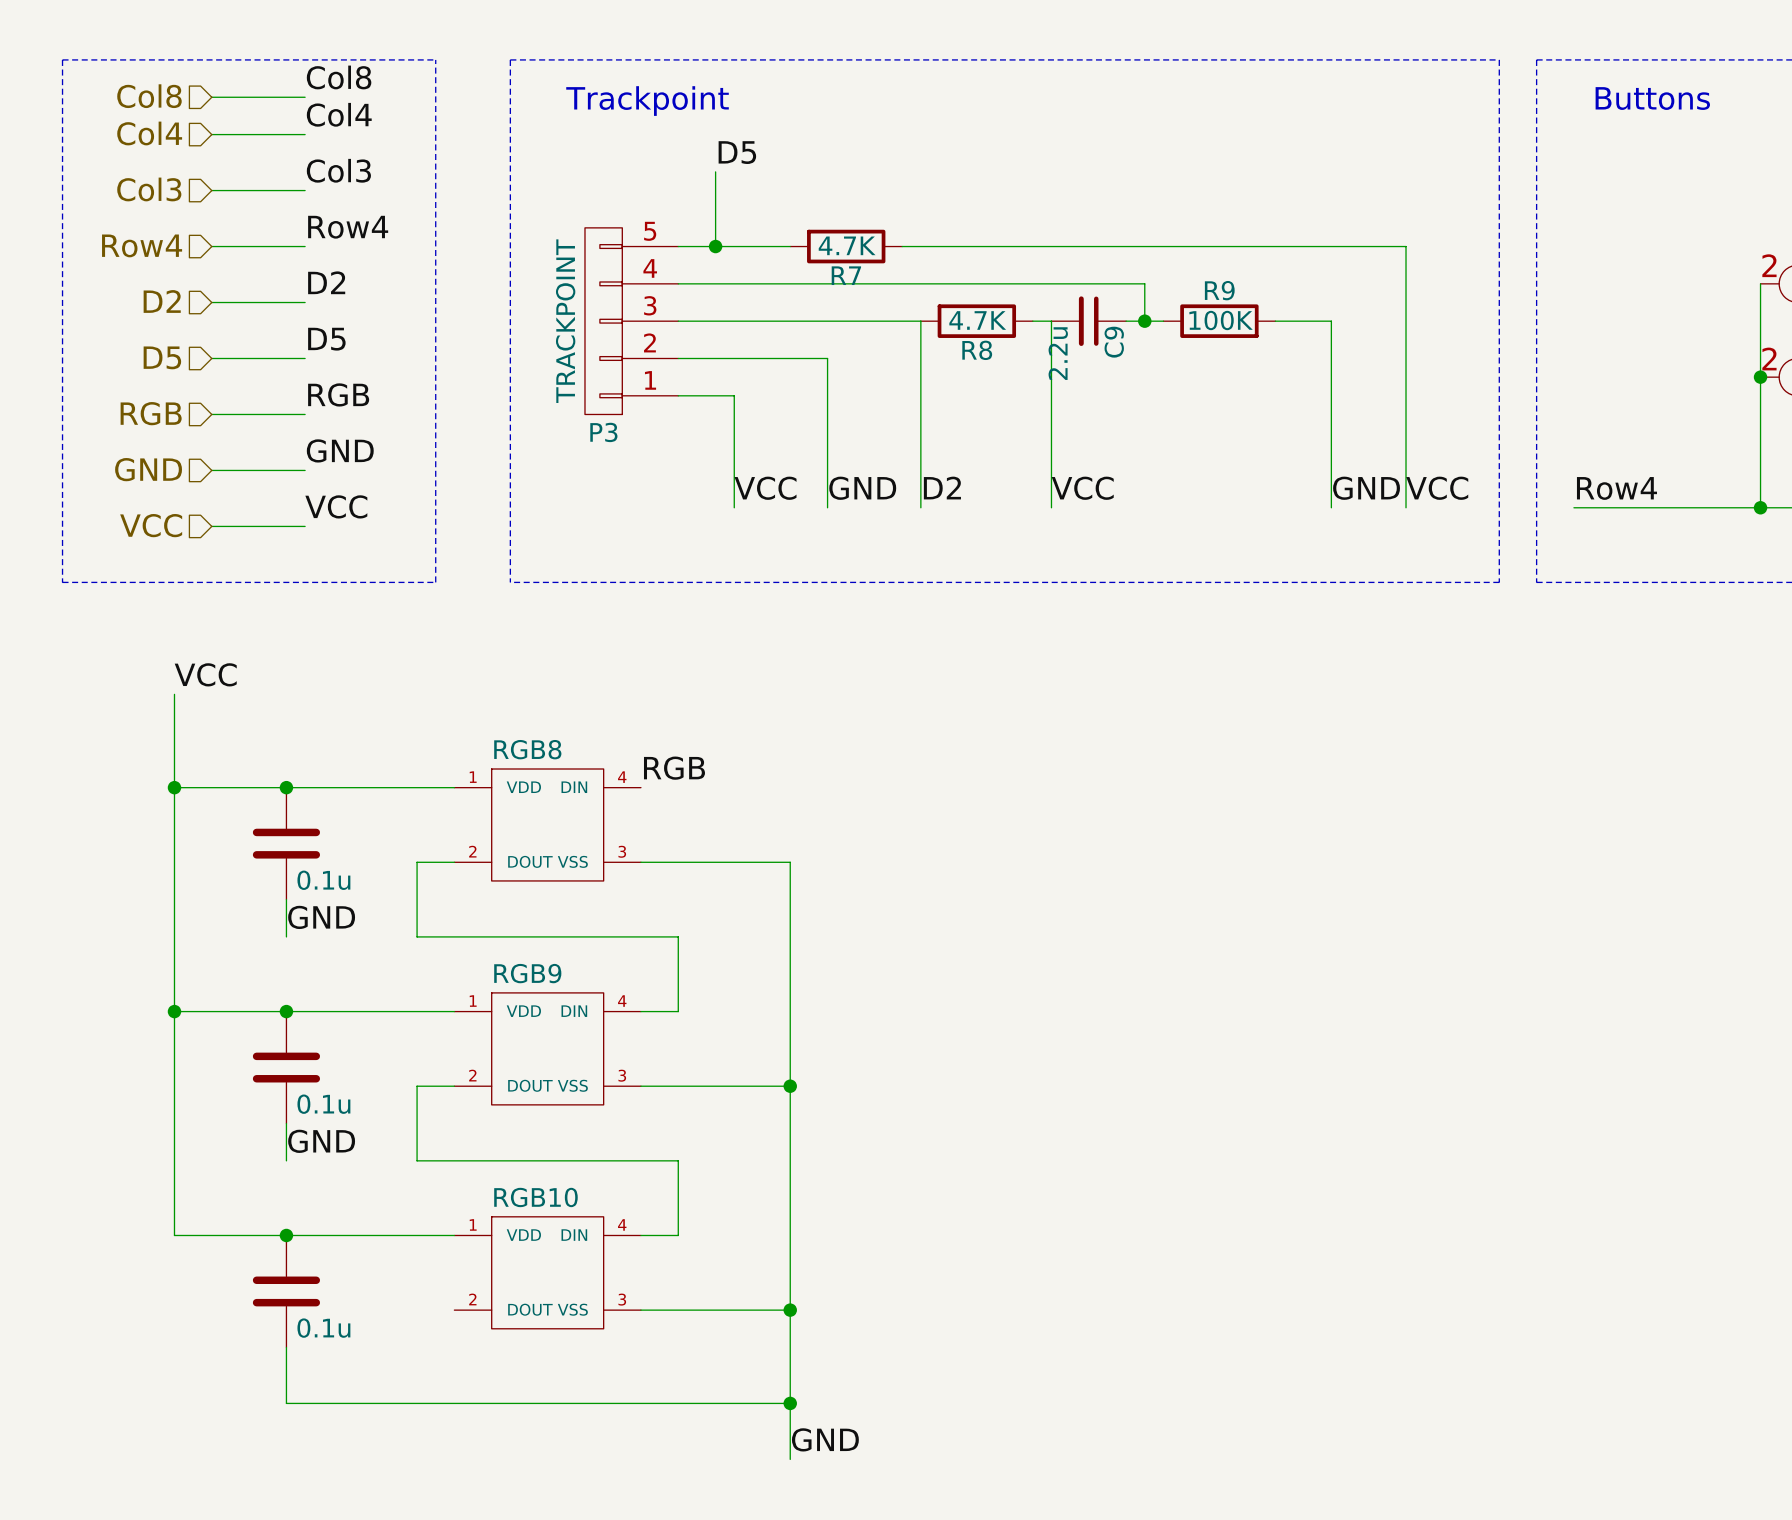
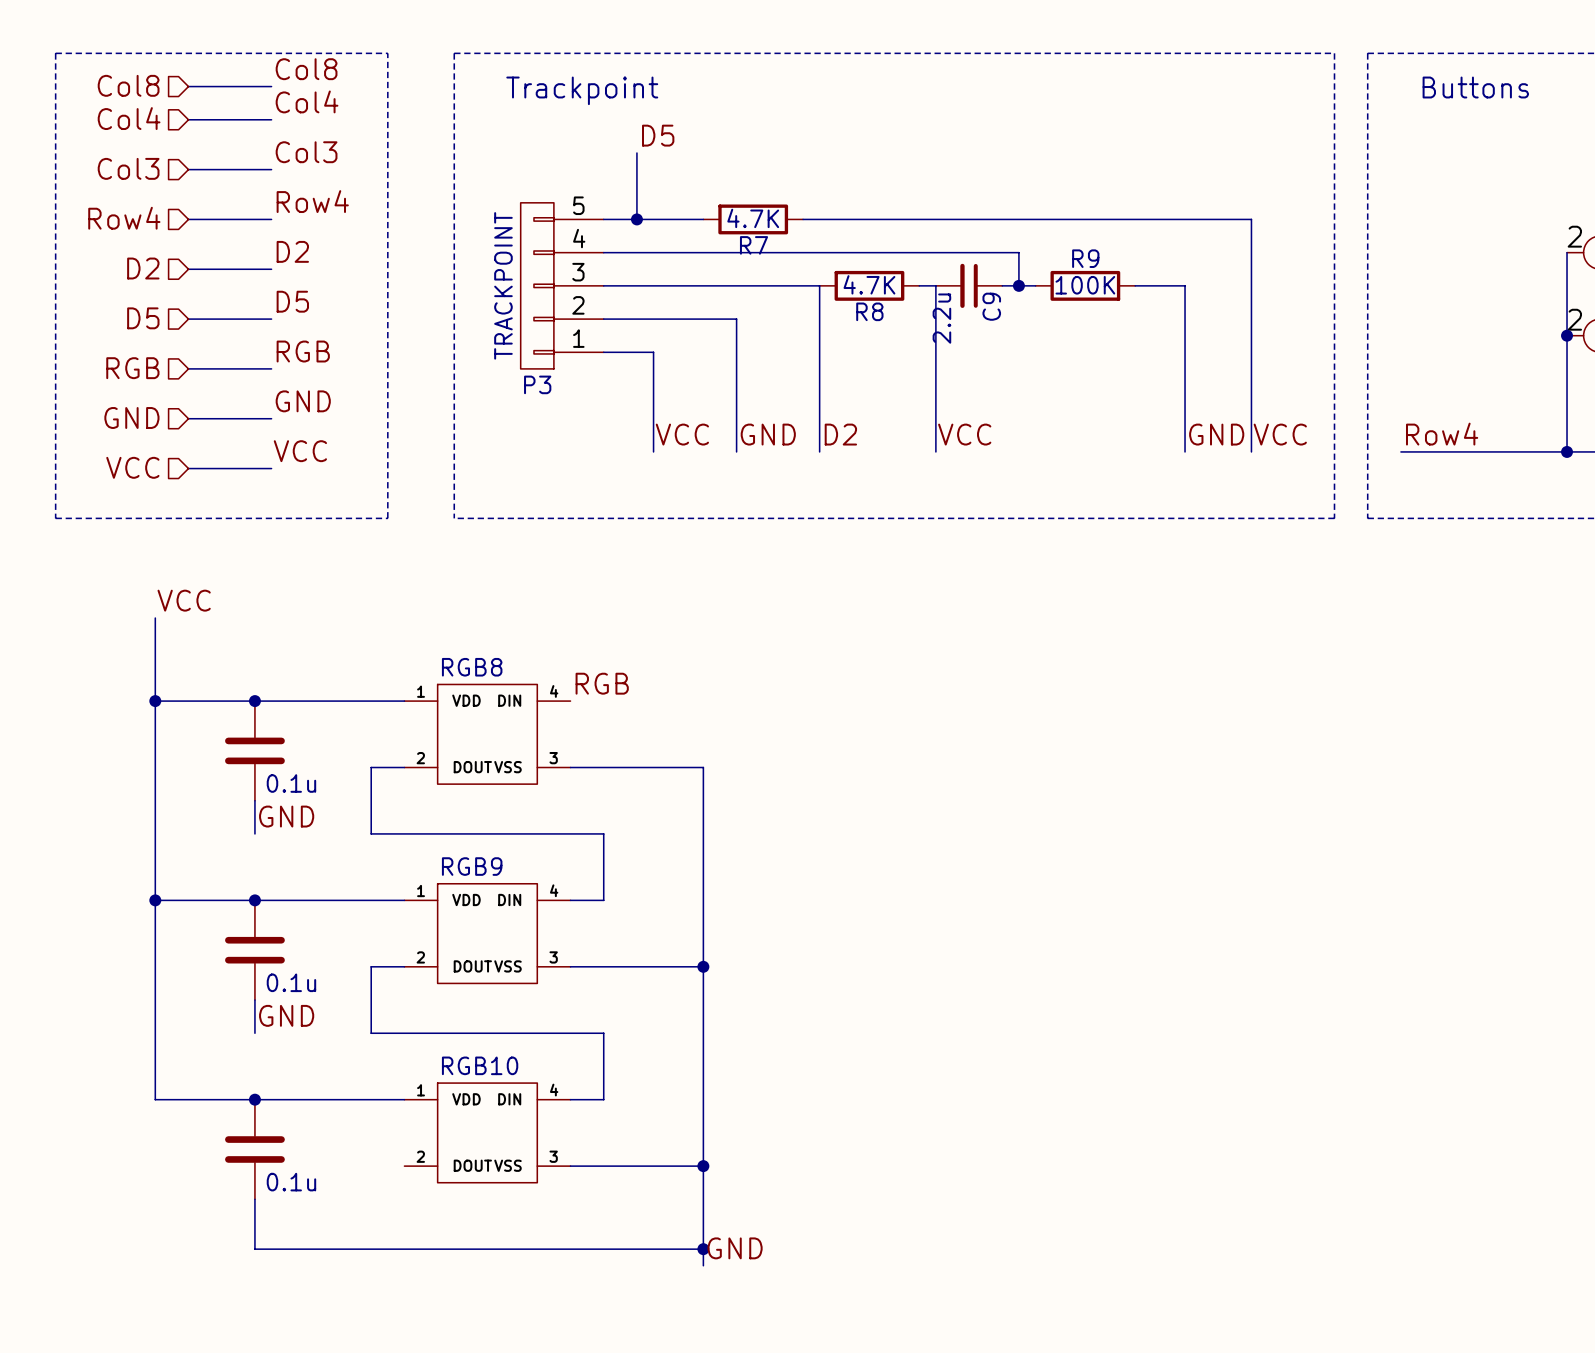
wire: (790, 1422) (790, 1459) -> none
label position: GND (825, 1439) -> GND (735, 1248)

